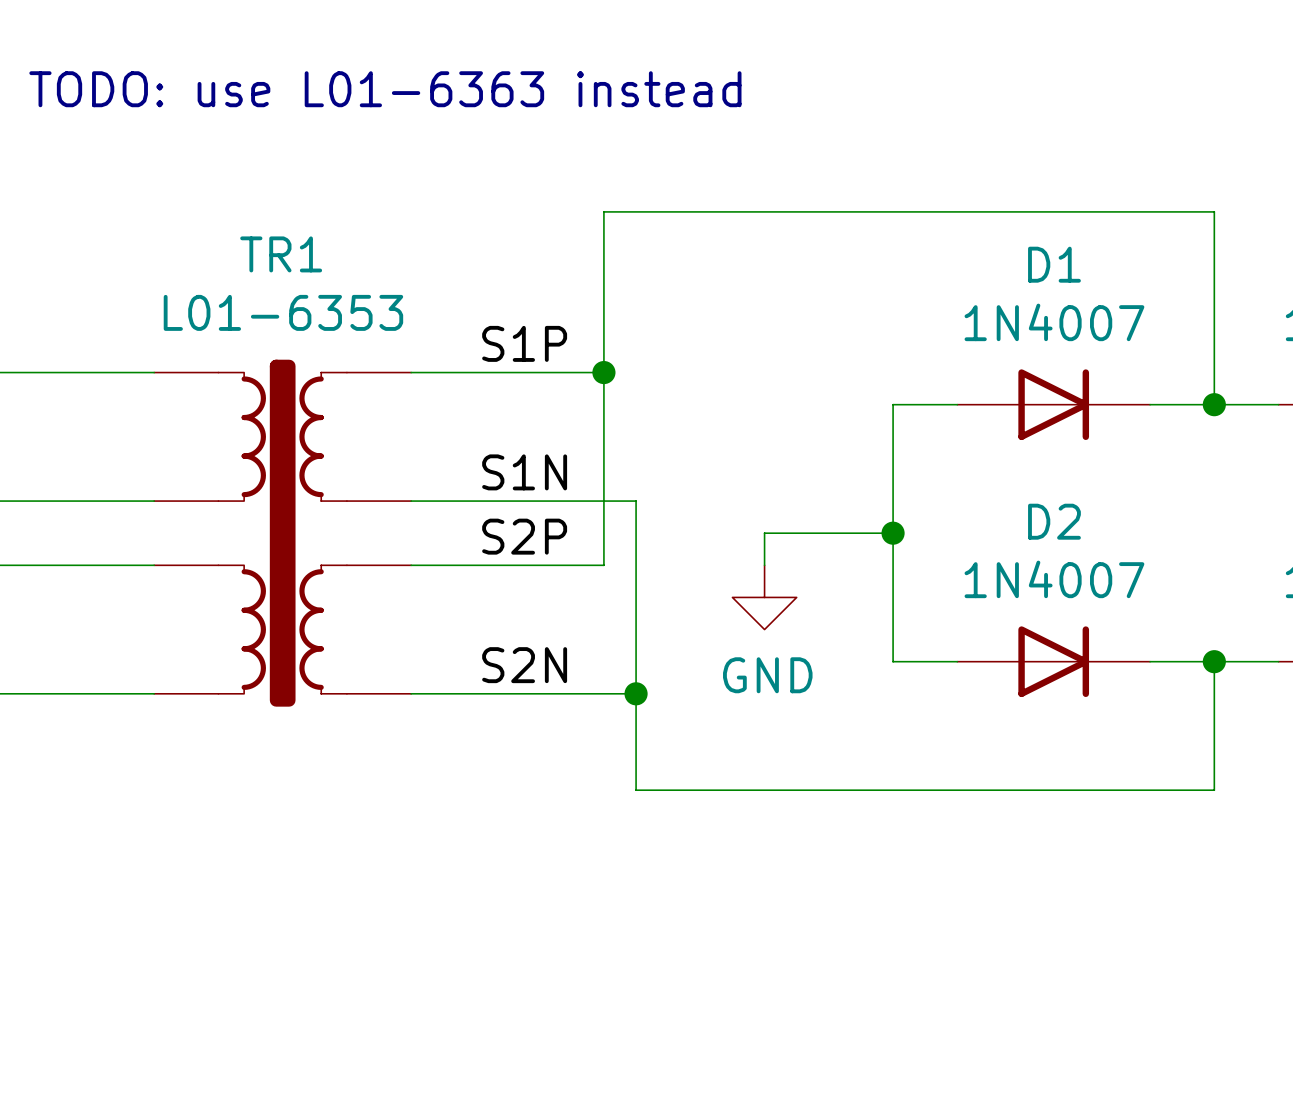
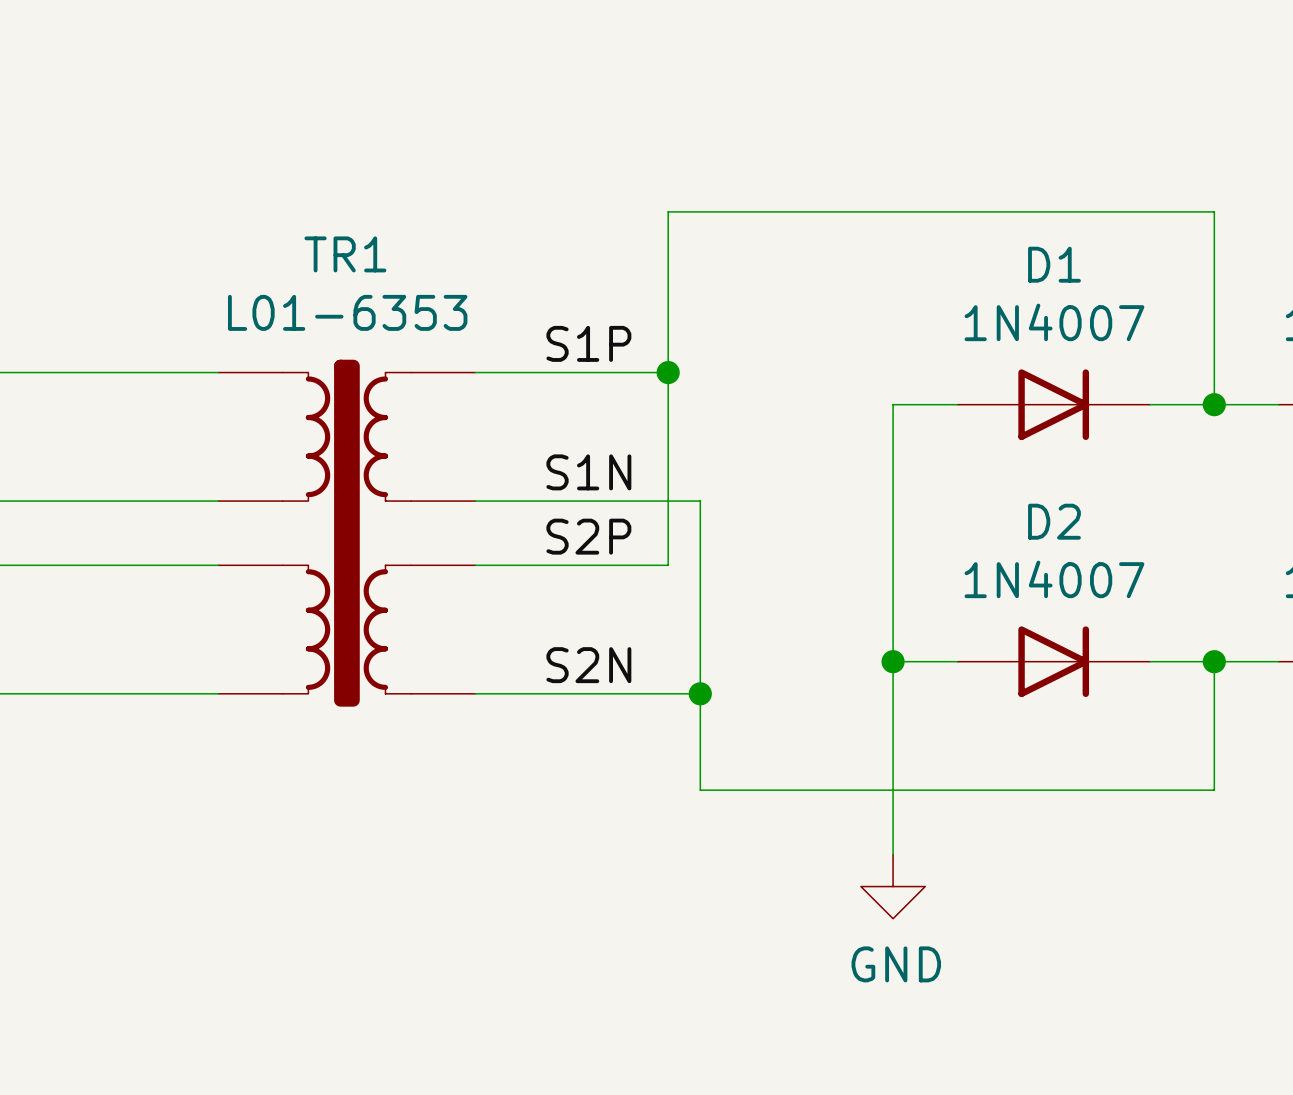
text: TODO: use L01-6363 instead (385, 89) -> none
wire: (668, 211) (603, 211) (603, 565) -> (668, 211) (668, 565) (603, 565)
label position: S1P (524, 343) -> S1P (588, 343)
wire: none -> (603, 372) (668, 372)
junction position: (603, 372) -> (668, 372)
label position: S1N (524, 472) -> S1N (588, 472)
wire: (636, 501) (636, 790) (700, 790) -> (636, 501) (700, 501) (700, 790)
TR1 position: (282, 533) -> (346, 533)
wire: (893, 533) (764, 533) (764, 565) -> none
junction: (893, 533) -> none
label position: S2P (524, 536) -> S2P (588, 536)
power symbol position: GND (764, 597) -> GND (893, 886)
wire: none -> (893, 661) (893, 854)
junction: none -> (893, 661)
label position: S2N (524, 665) -> S2N (588, 665)
wire: none -> (636, 693) (700, 693)
junction position: (636, 693) -> (700, 693)

